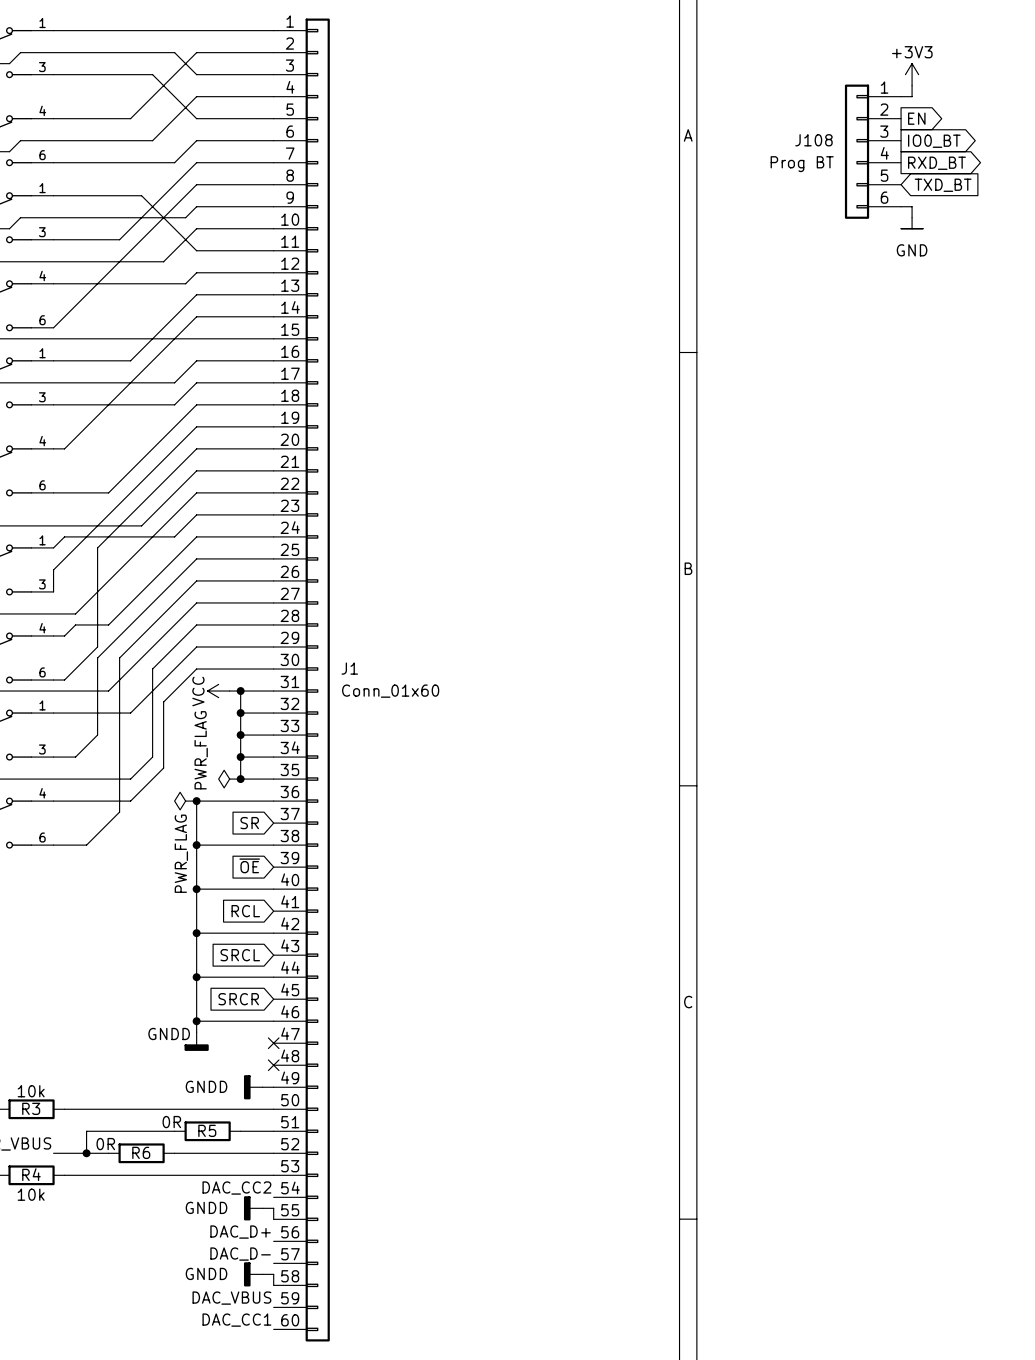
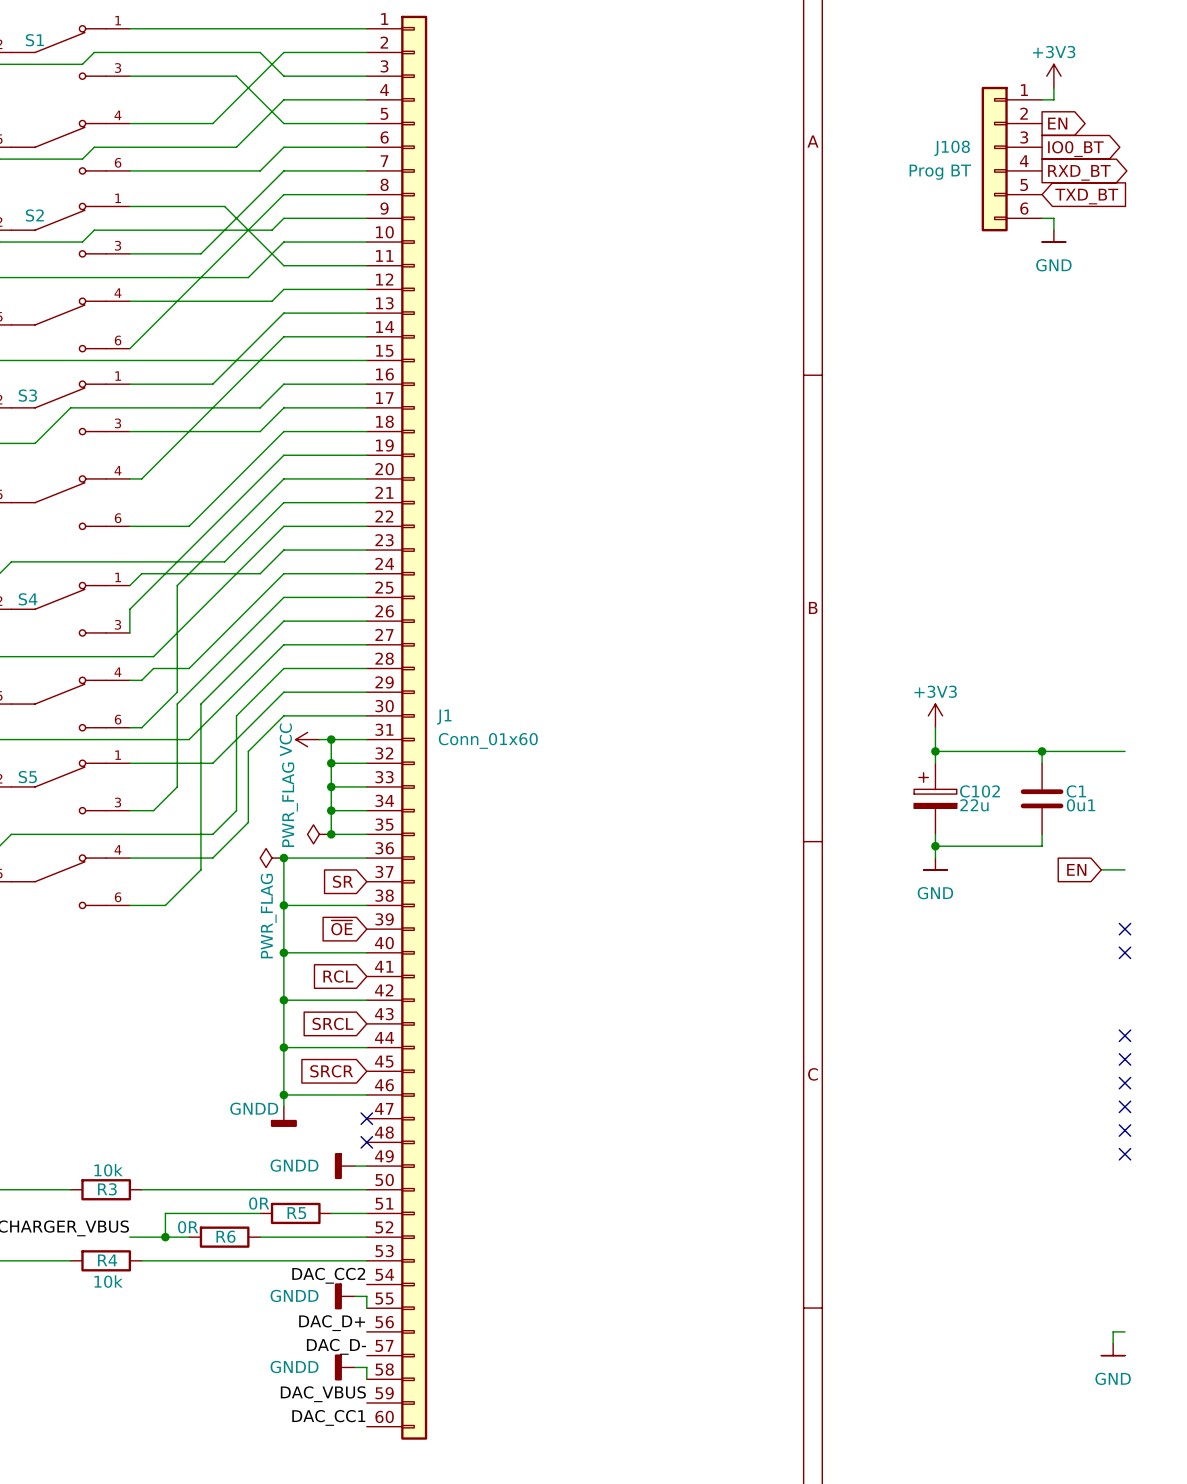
power symbol: none -> +3V3 (935, 715)
wire: none -> (935, 727) (935, 763)
wire: none -> (935, 751) (1124, 751)
junction: none -> (935, 751)
wire: none -> (1042, 751) (1042, 763)
junction: none -> (1042, 751)
C102: none -> 22u (935, 798)
C1: none -> 0u1 (1042, 798)
wire: none -> (935, 834) (935, 858)
wire: none -> (1042, 834) (1042, 846) (935, 846)
junction: none -> (935, 846)
power symbol: none -> GND (935, 863)
global label: none -> EN (1076, 869)
wire: none -> (1101, 869) (1124, 869)
no-connect mark: none -> (1124, 929)
no-connect mark: none -> (1124, 952)
no-connect mark: none -> (1124, 1035)
no-connect mark: none -> (1124, 1059)
no-connect mark: none -> (1124, 1083)
no-connect mark: none -> (1124, 1106)
no-connect mark: none -> (1124, 1130)
no-connect mark: none -> (1124, 1154)
wire: none -> (1124, 1331) (1113, 1331) (1113, 1343)
power symbol: none -> GND (1113, 1349)

